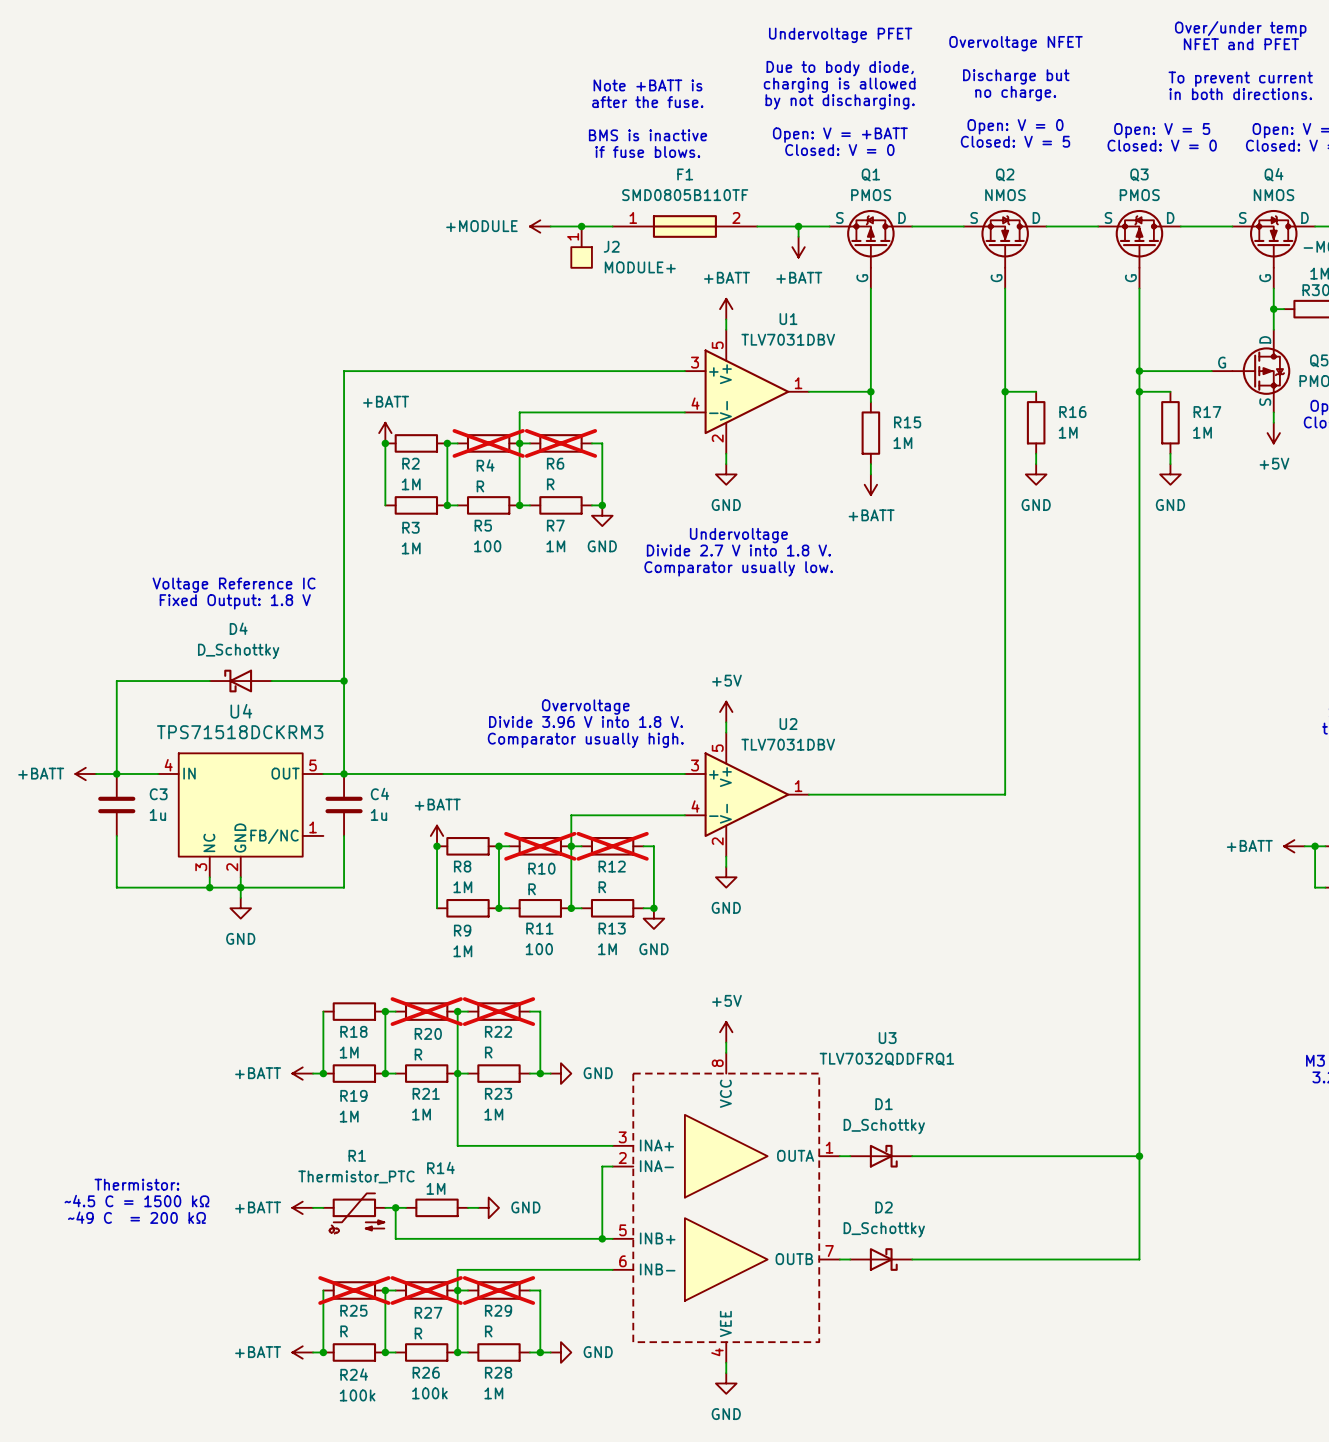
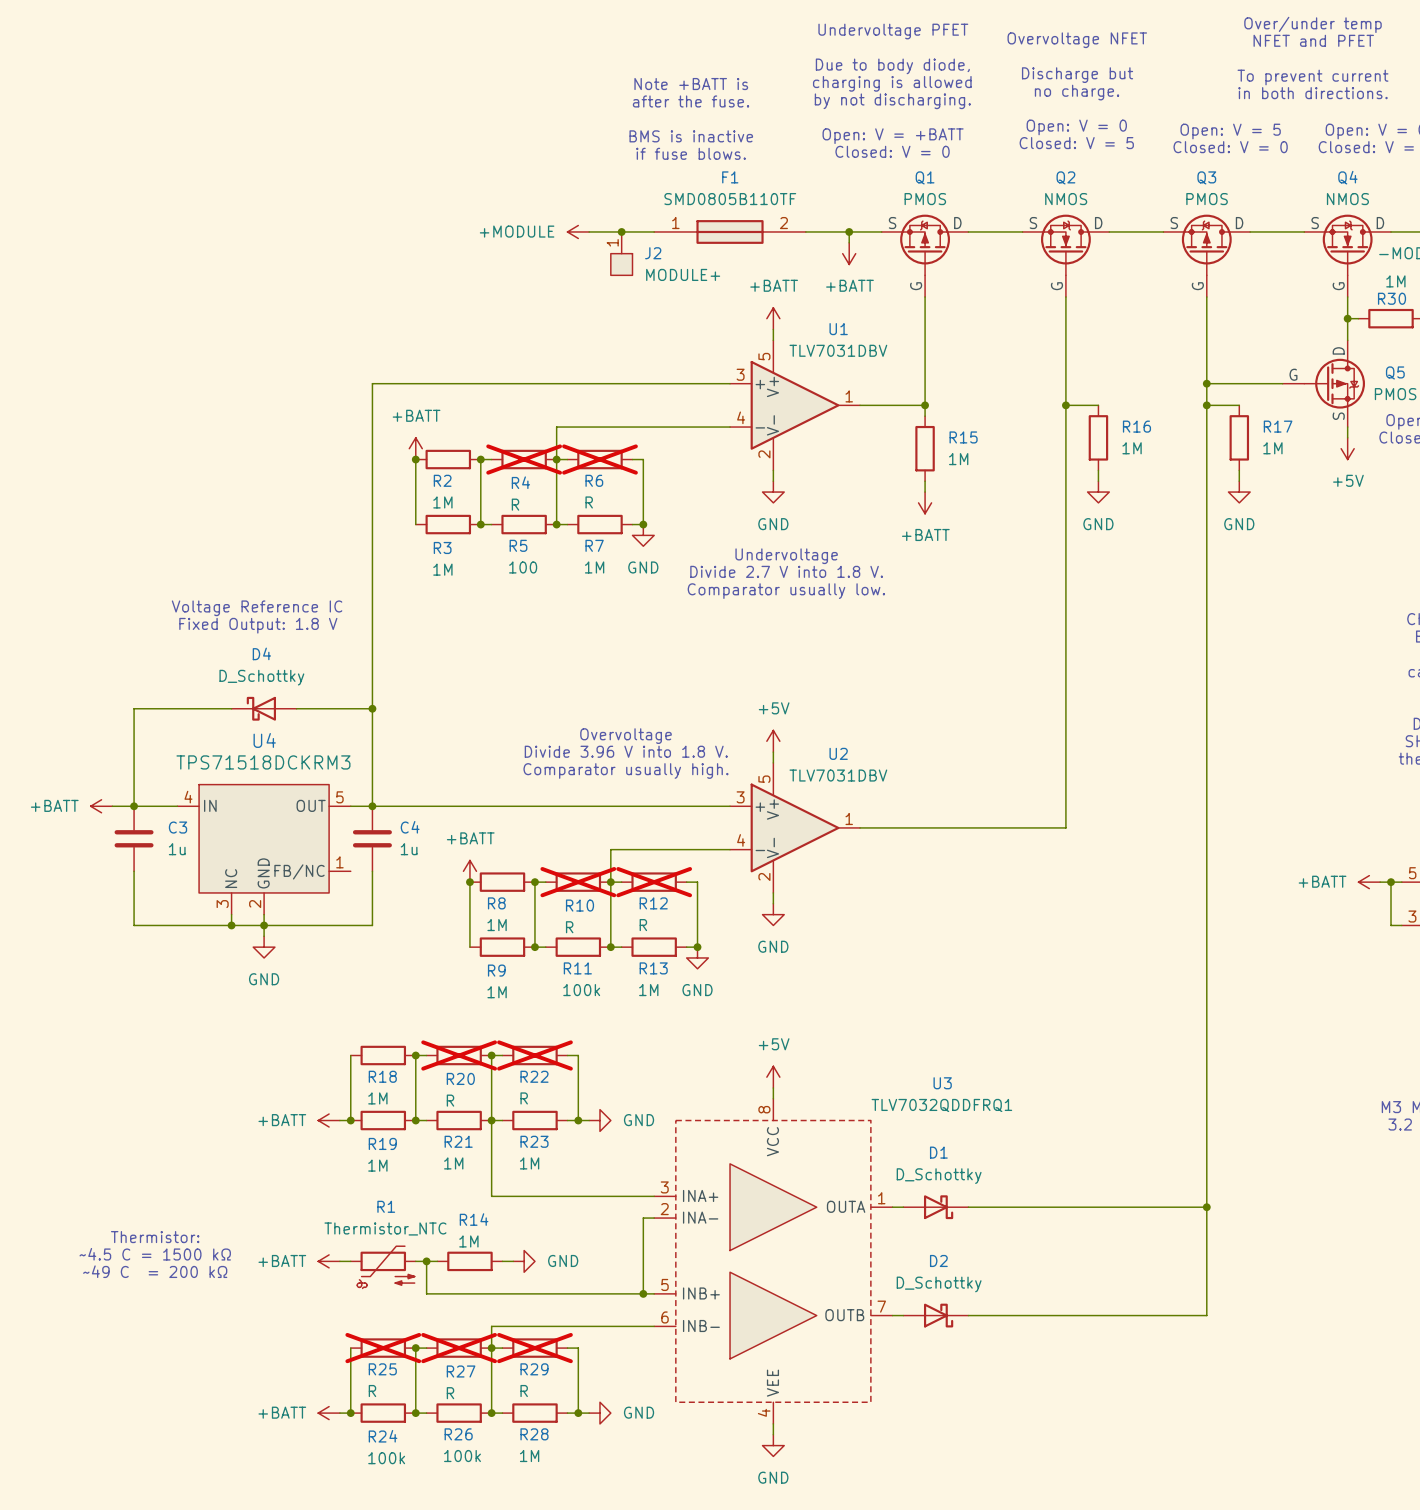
R11 value: 100 (539, 949) -> 100k (581, 990)
R1 value: Thermistor_PTC (356, 1176) -> Thermistor_NTC (385, 1228)

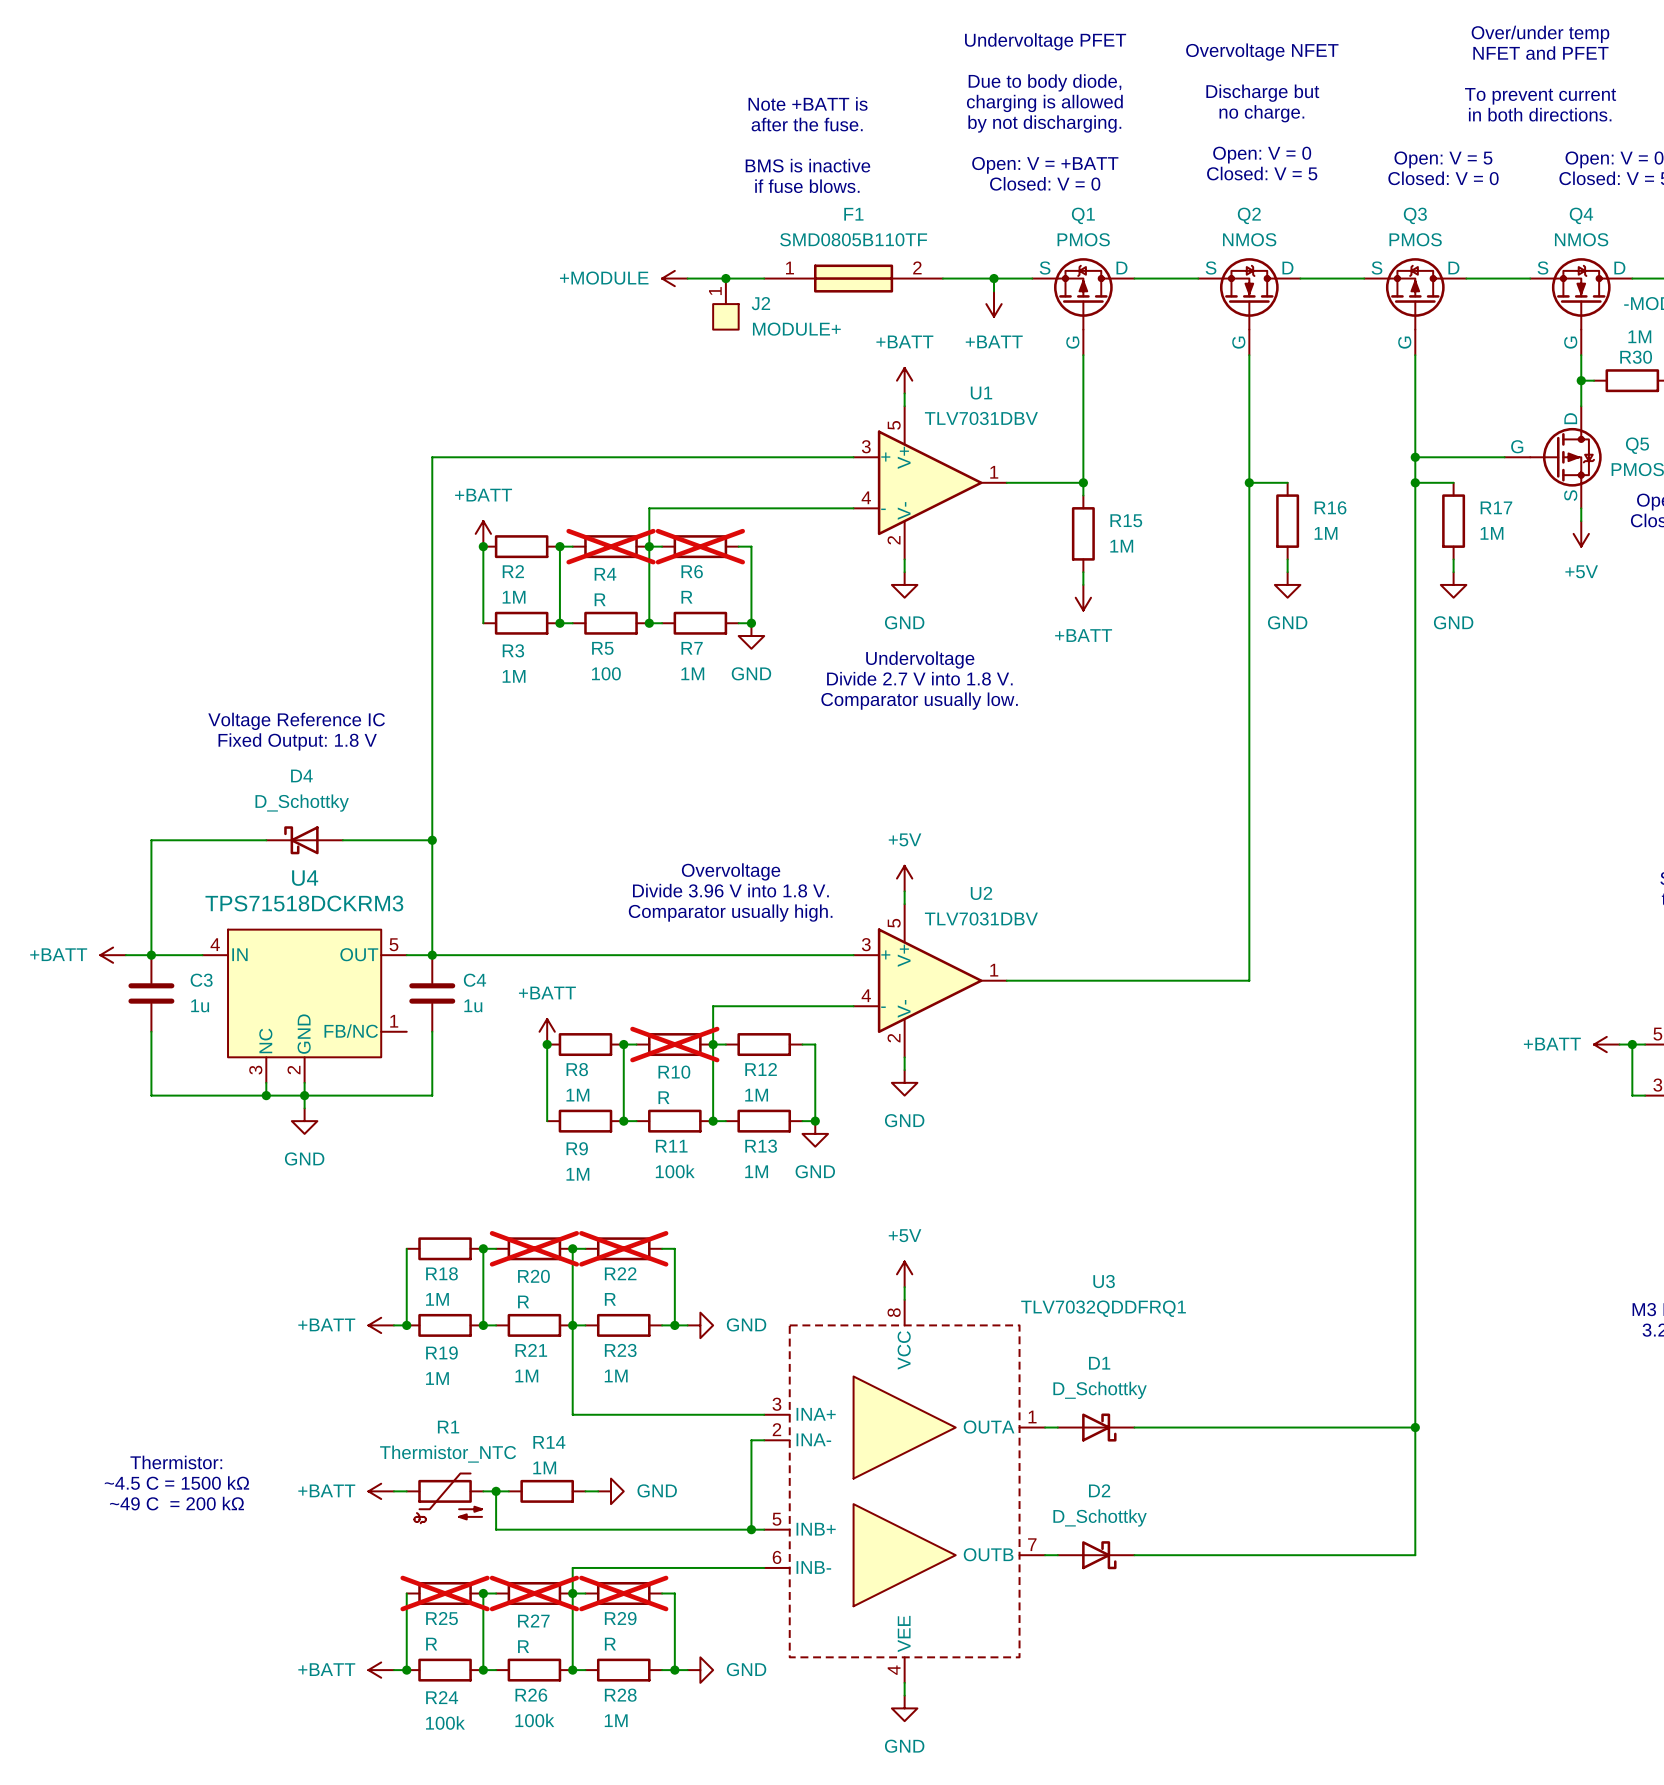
R12 do-not-place cross: (654, 882) -> none
R12 value: R (643, 925) -> 1M (756, 1095)

